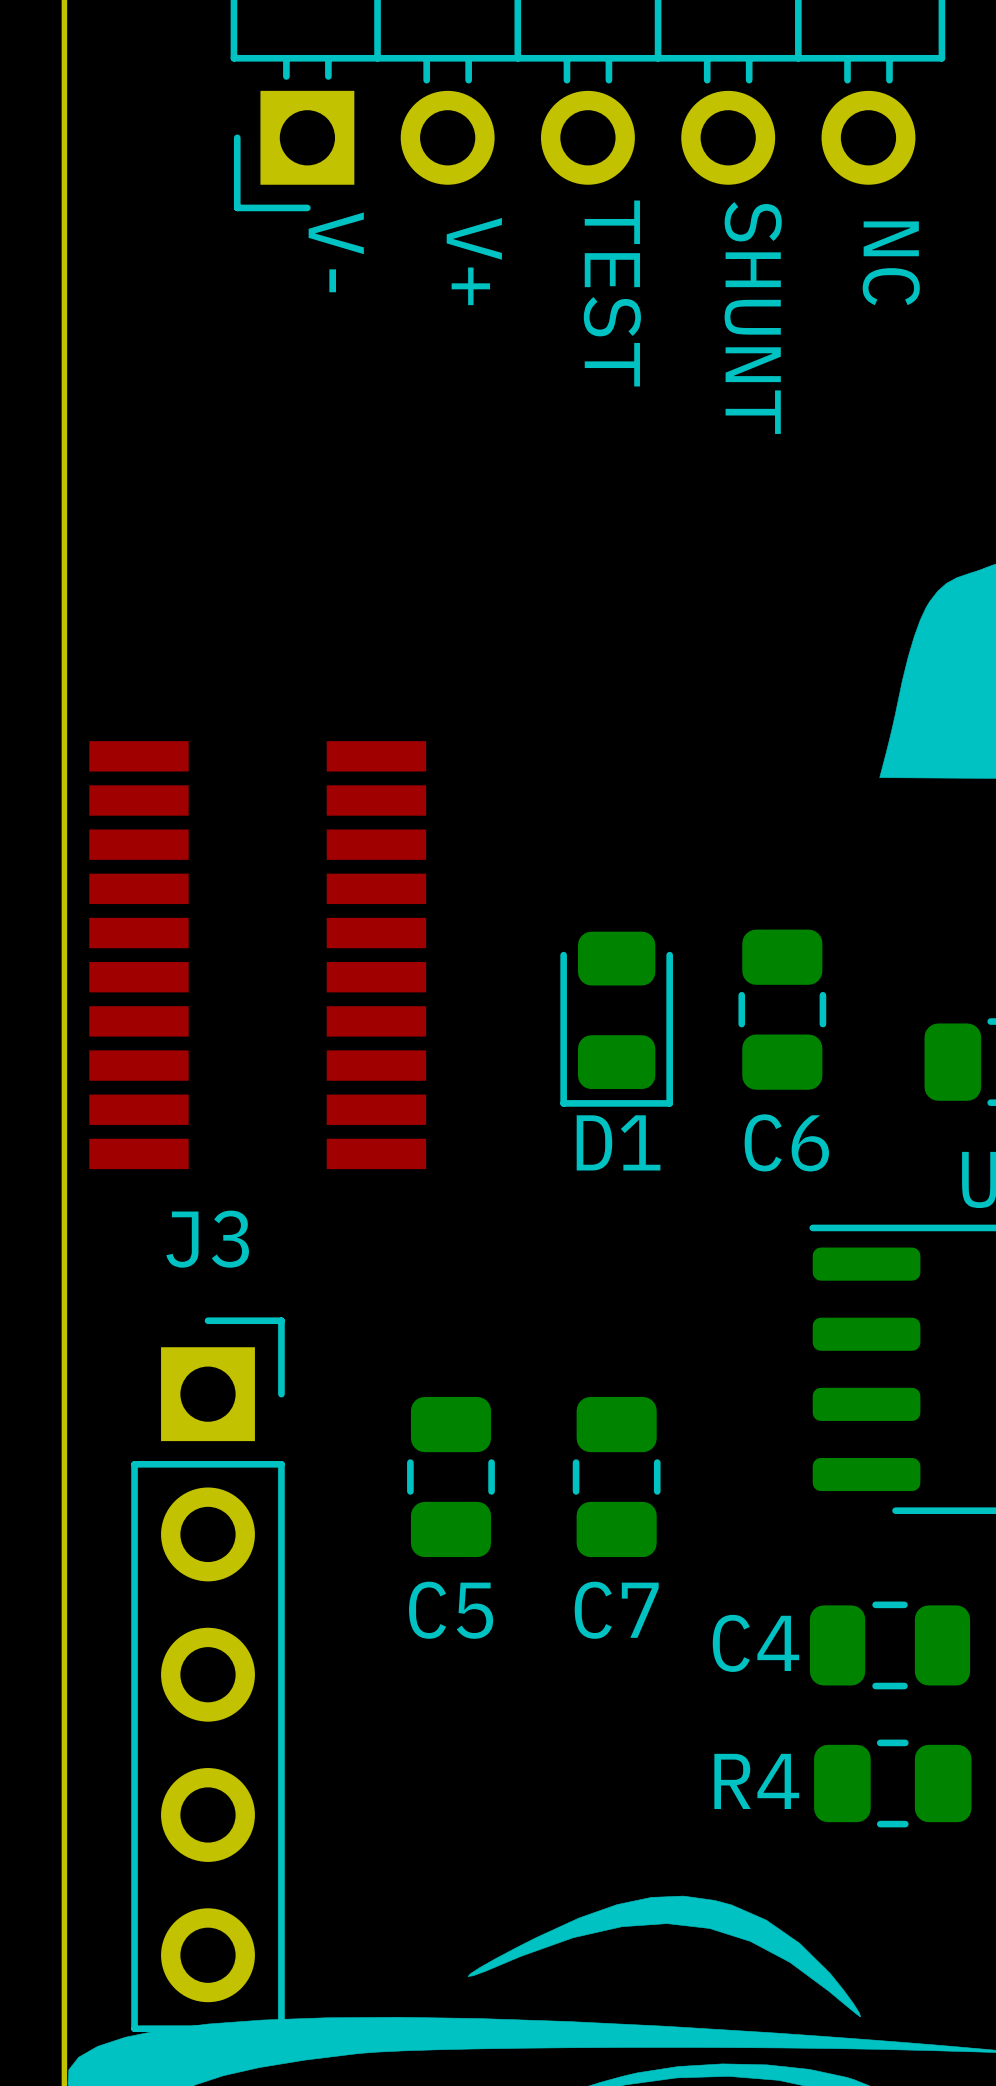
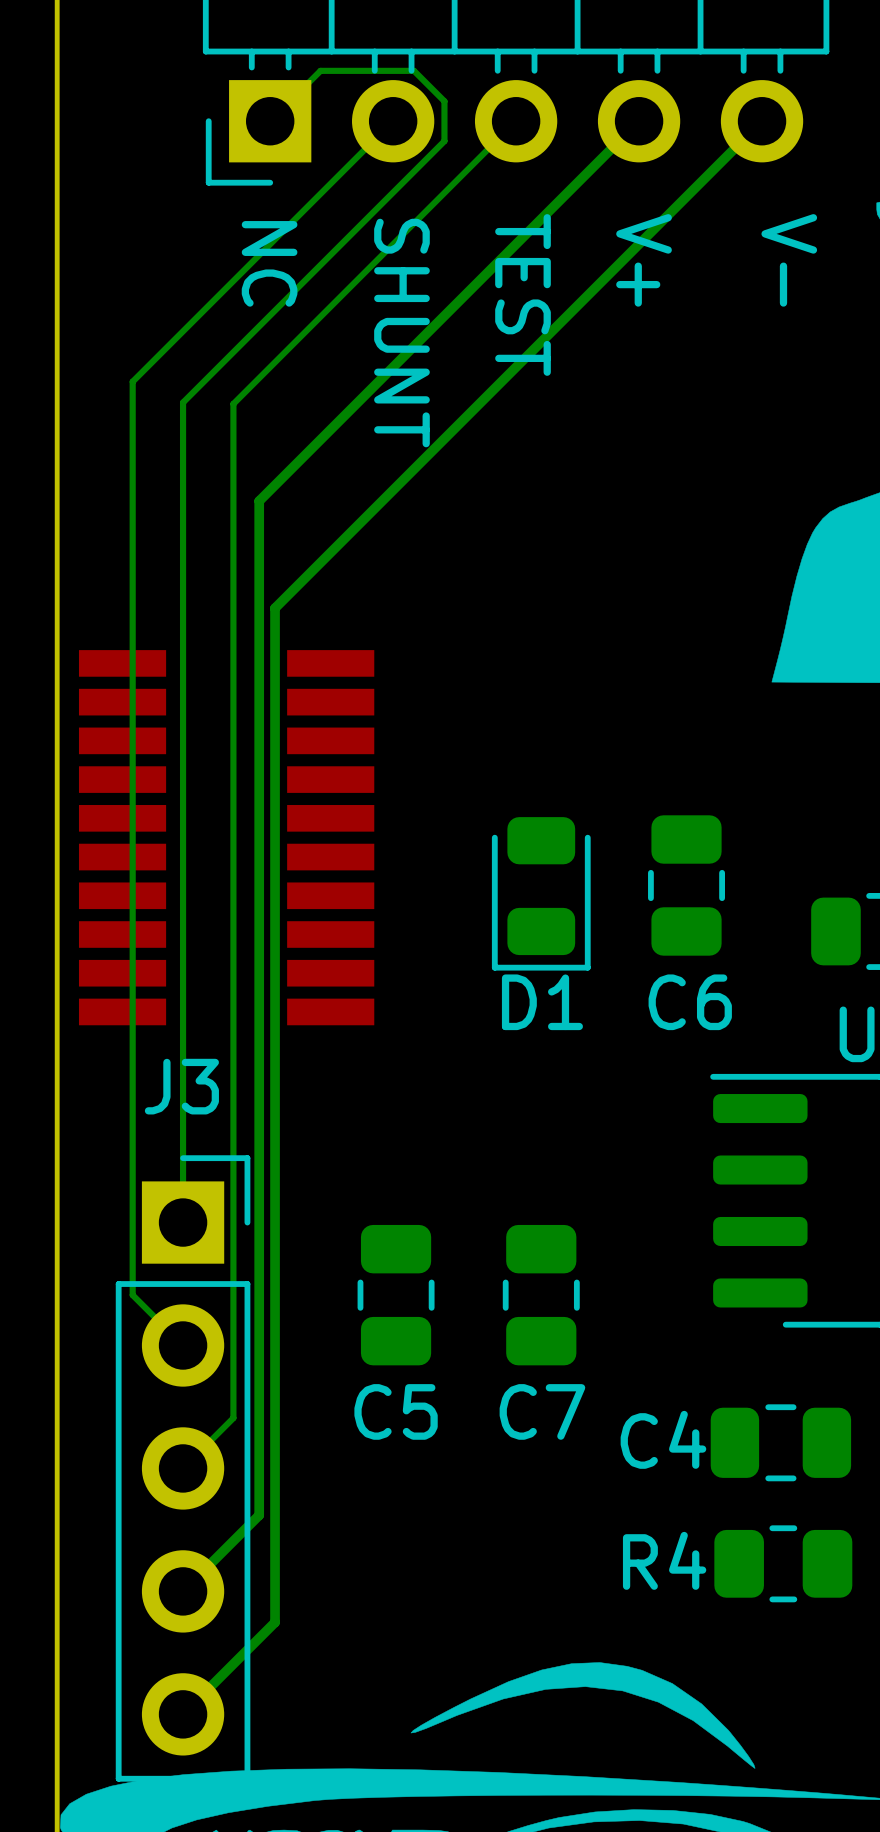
bottom track: none -> (270, 121) (320, 70) (414, 70) (444, 101) (444, 141) (183, 402) (183, 1222)
bottom track: none -> (393, 121) (132, 381) (132, 1295) (183, 1345)
bottom track: none -> (516, 121) (233, 403) (233, 1418) (183, 1468)
bottom track: none -> (639, 121) (259, 501) (259, 1515) (183, 1591)
bottom track: none -> (762, 121) (275, 608) (275, 1622) (183, 1714)
text position: V- (336, 252) -> V- (789, 260)
text position: V+ (474, 261) -> V+ (644, 260)
text position: NC (891, 263) -> NC (269, 263)
text position: TEST (612, 293) -> TEST (523, 294)
text position: SHUNT (753, 318) -> SHUNT (401, 333)

